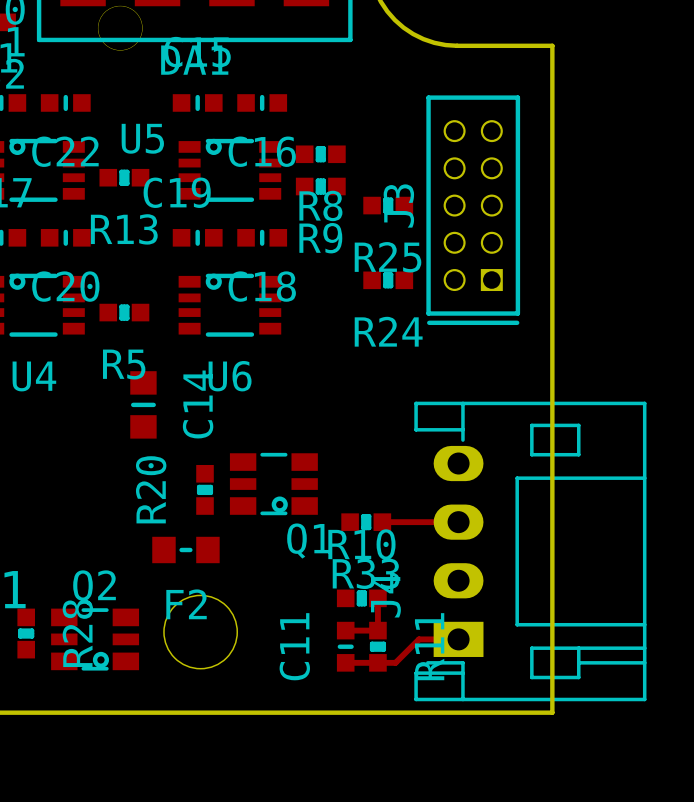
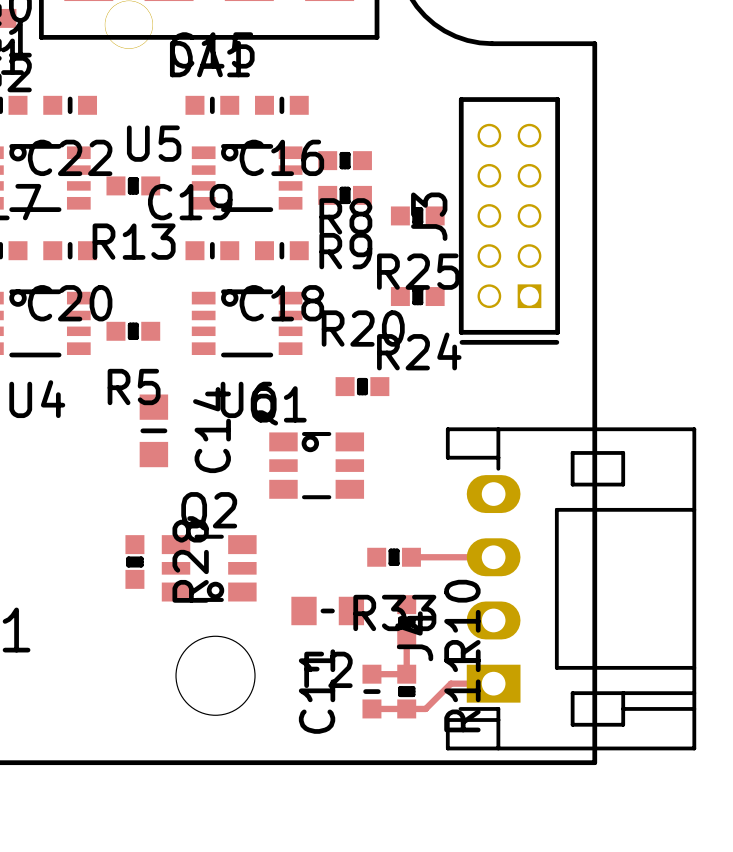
Q1 rotation: 0° (273, 484) -> 180° (316, 465)
R20 rotation: 0° (205, 489) -> 90° clockwise (362, 386)
R20 position: (205, 489) -> (362, 386)
F2 position: (185, 549) -> (327, 610)
R10 rotation: 0° (361, 598) -> 90° clockwise (406, 622)
R28 position: (26, 633) -> (134, 562)
Q2 position: (95, 639) -> (209, 568)

